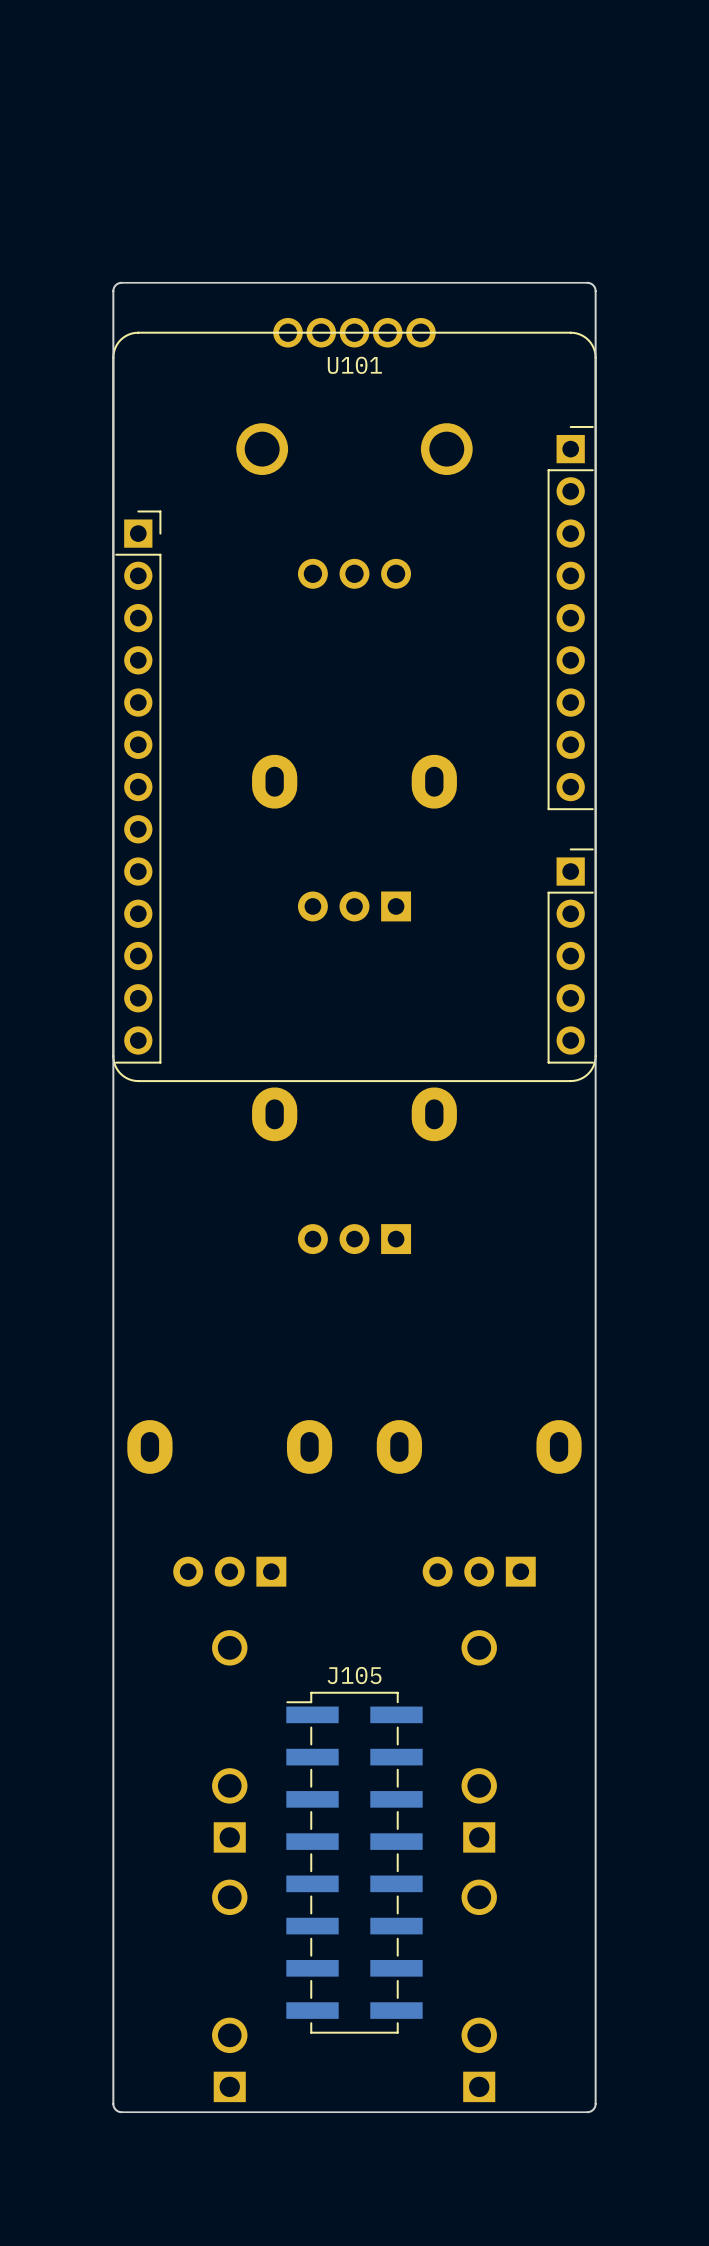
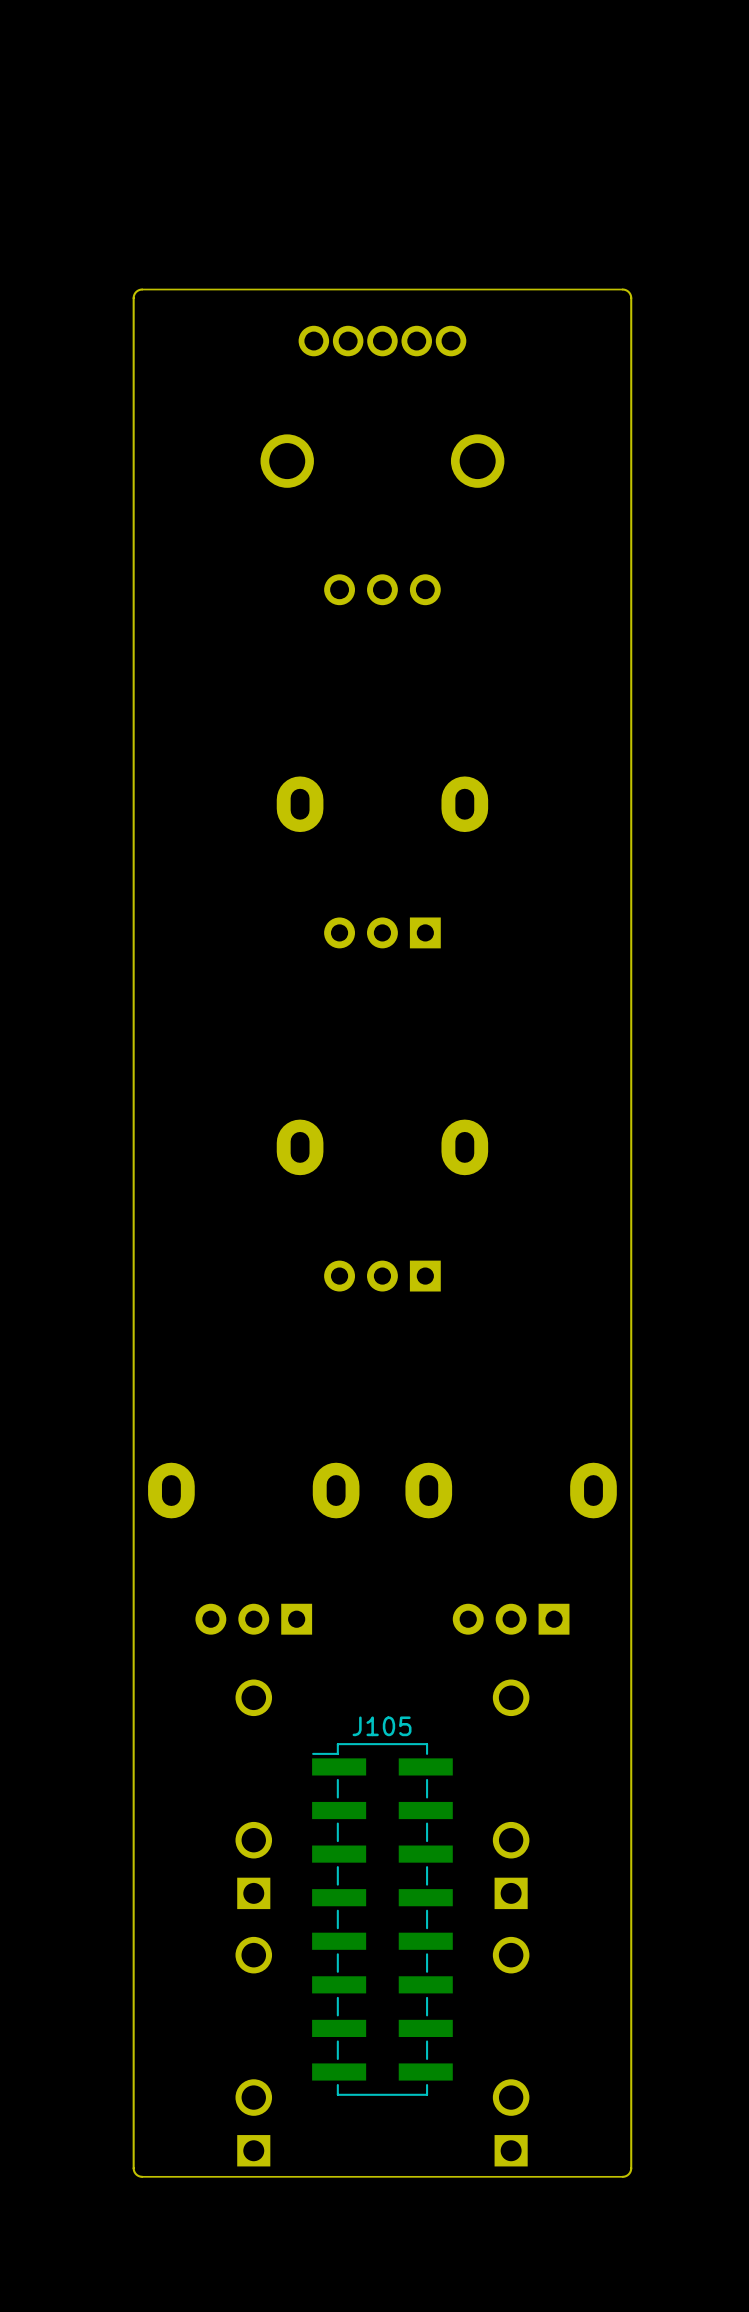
U101: (354, 706) -> none

